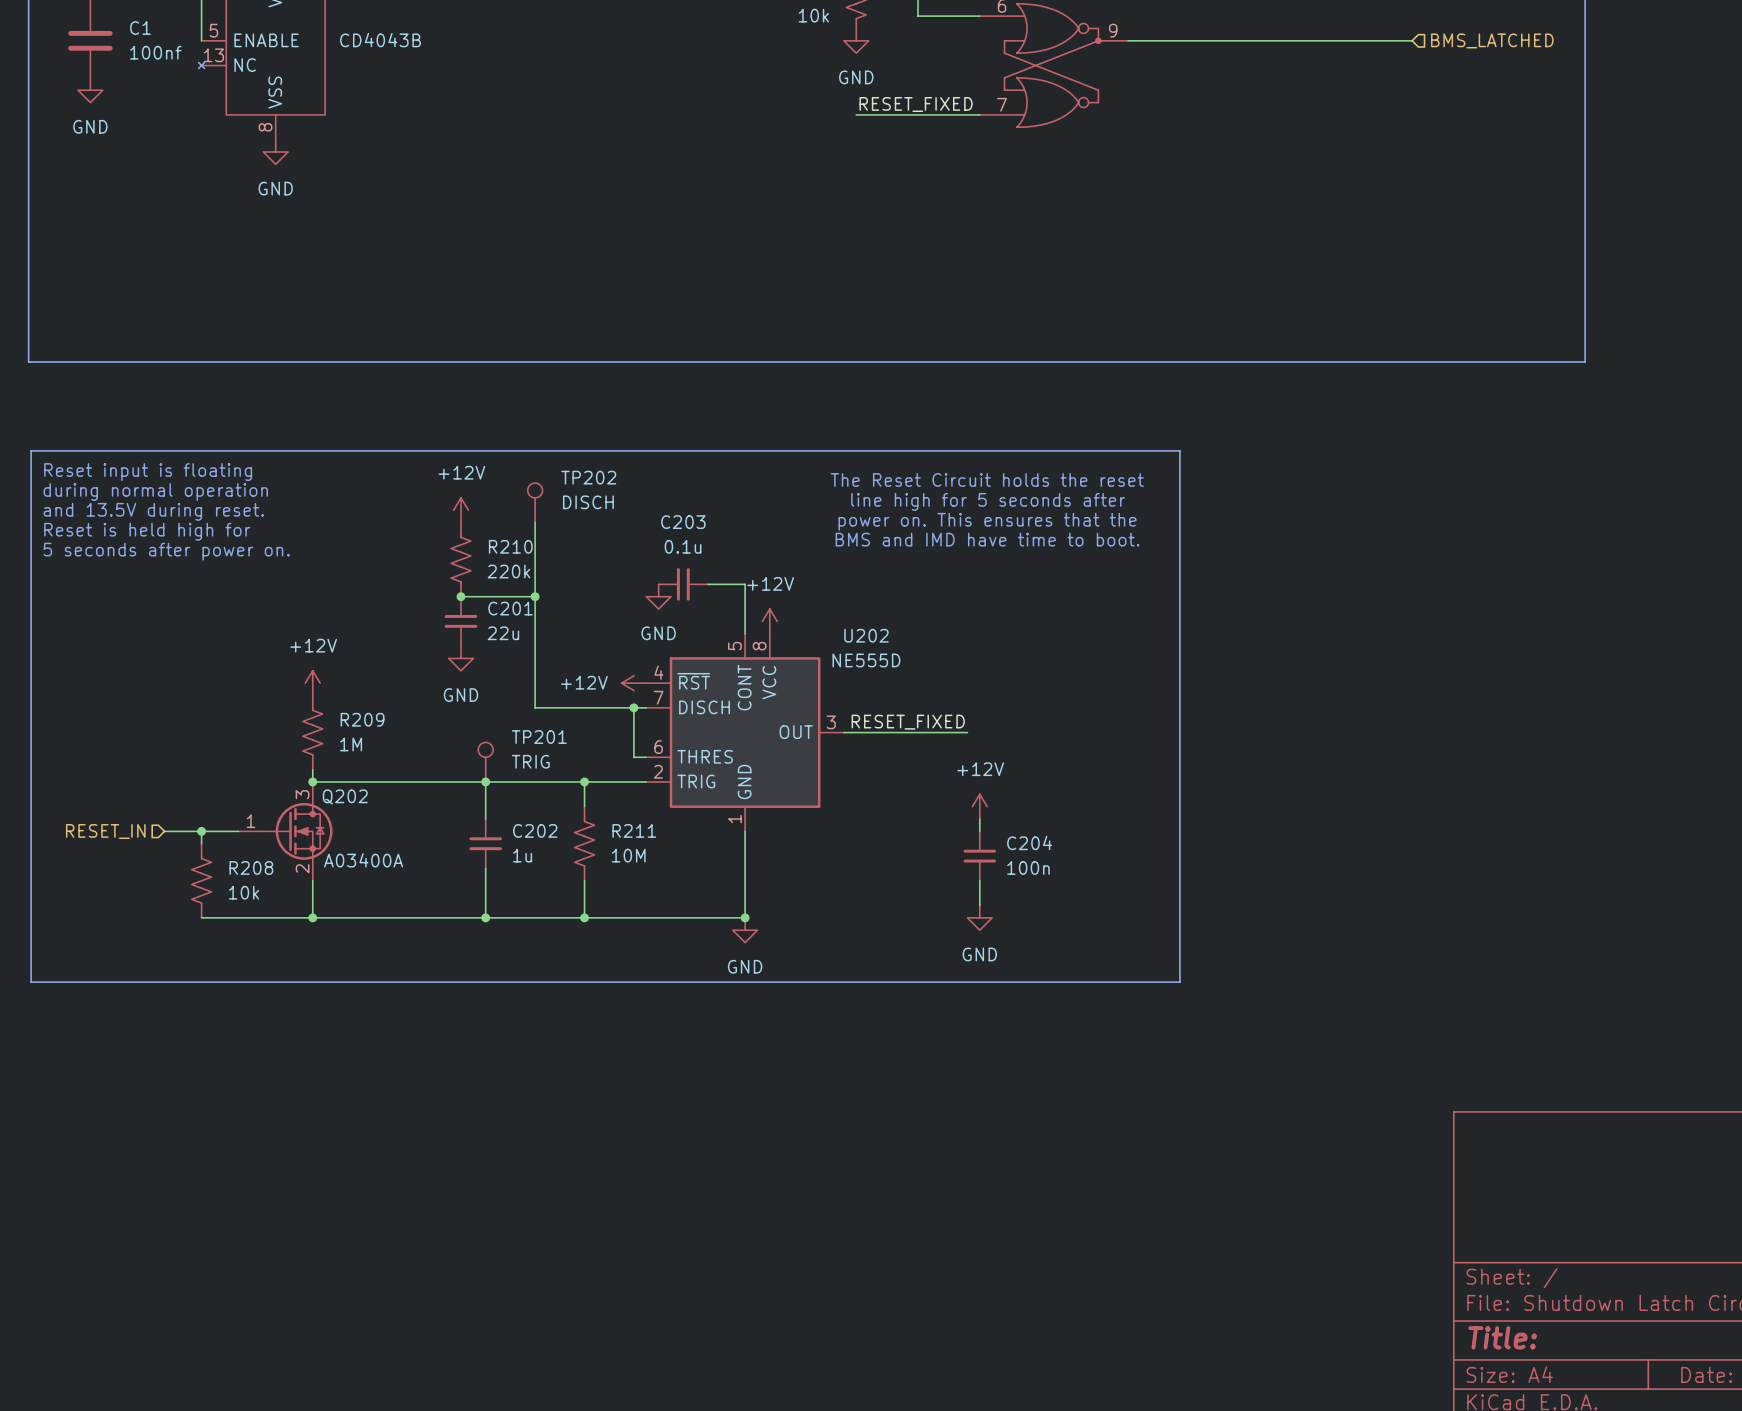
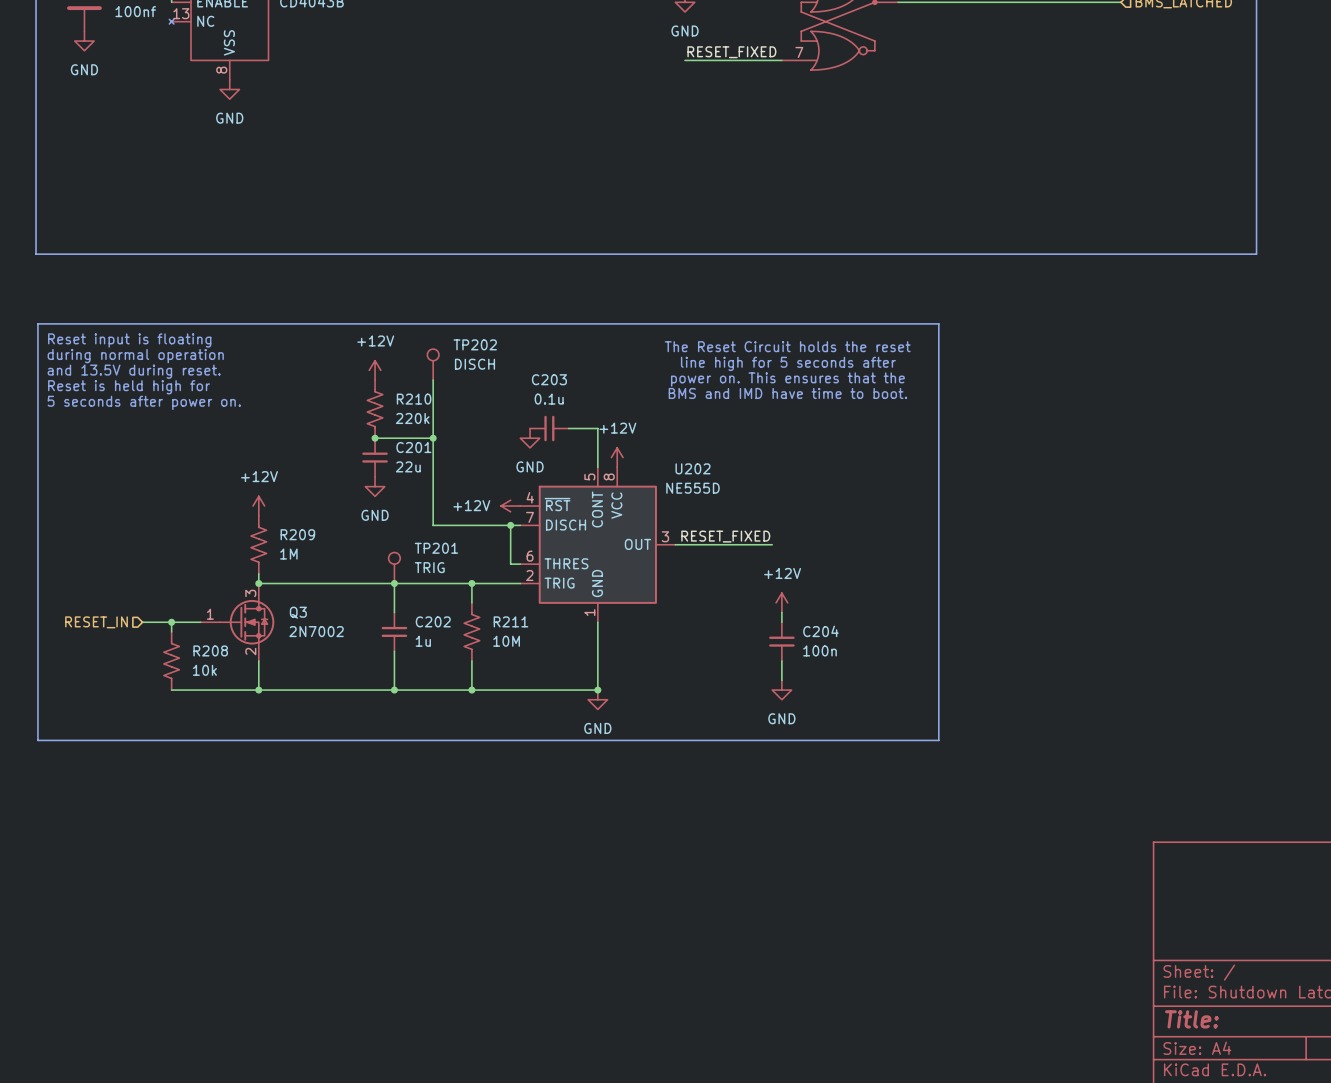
Q202 name: Q202 (345, 796) -> Q3 (298, 612)
Q202 value: A03400A (363, 860) -> 2N7002 (316, 631)

